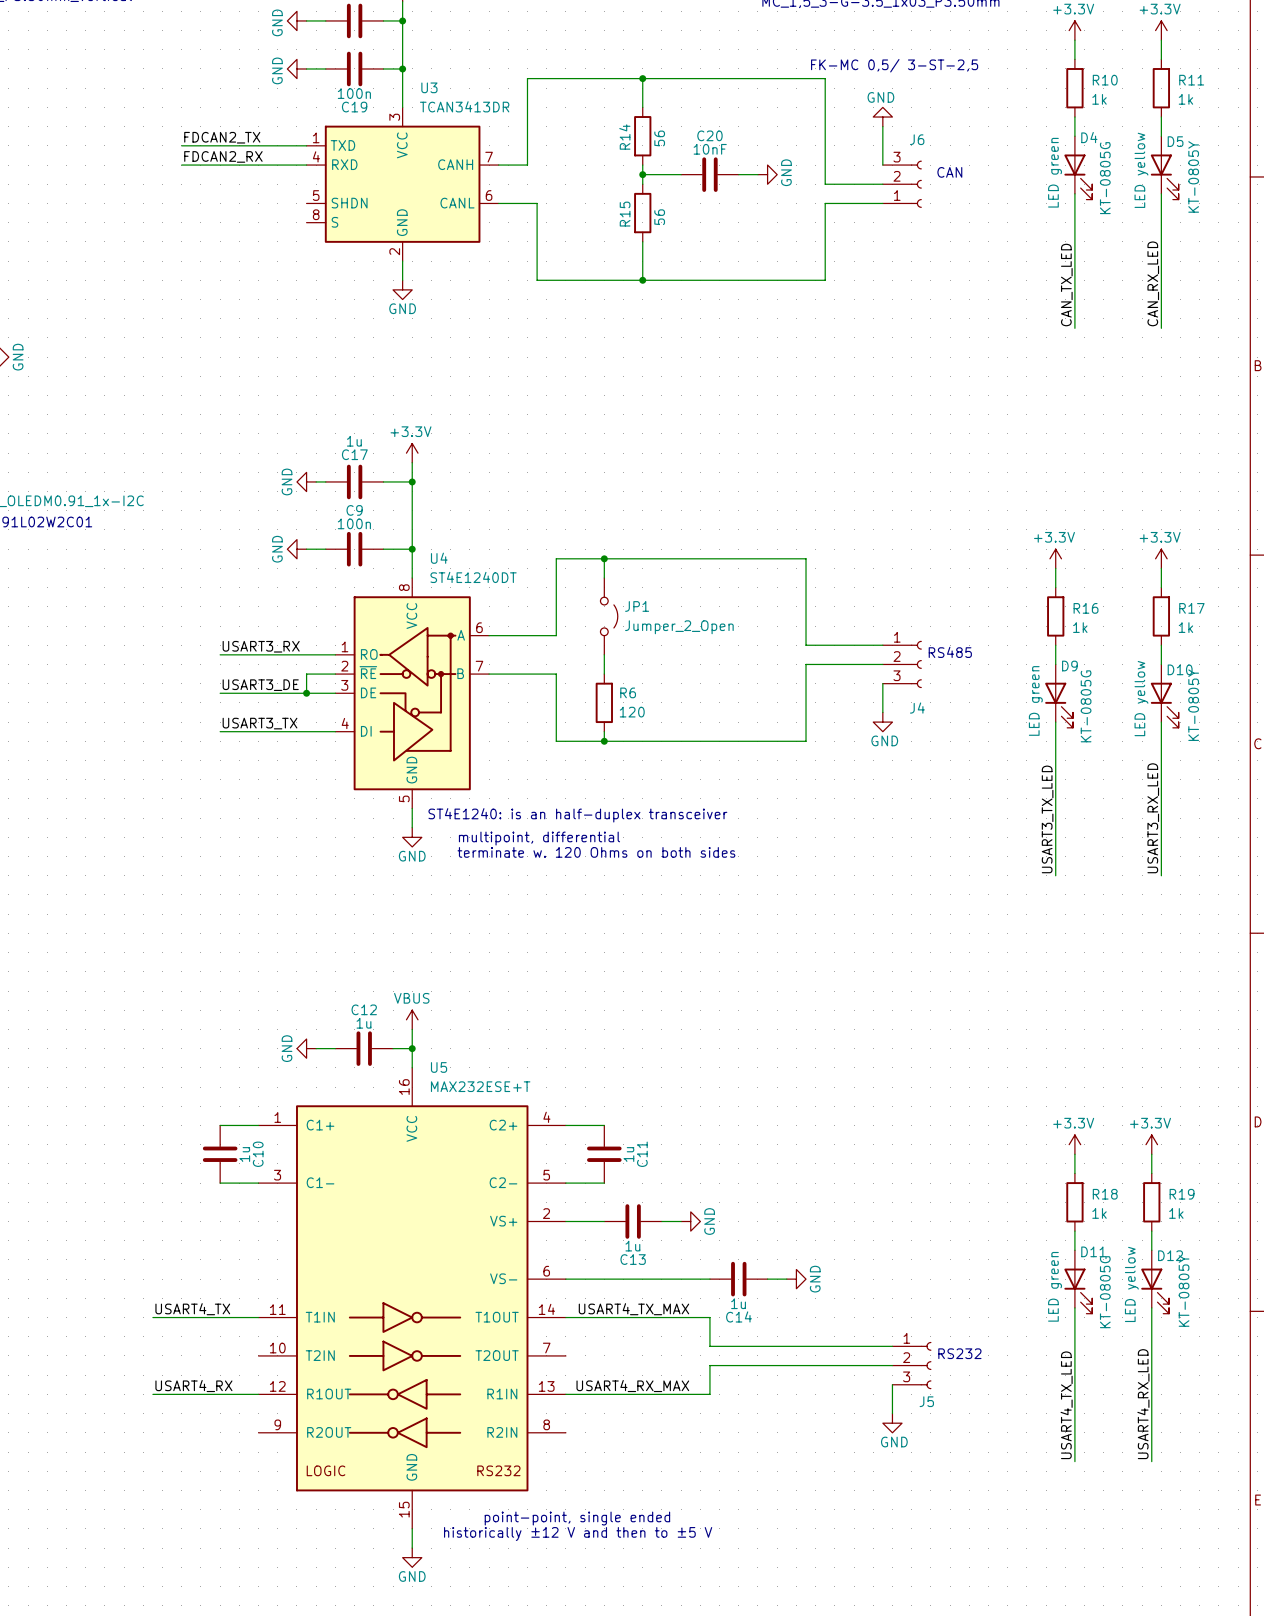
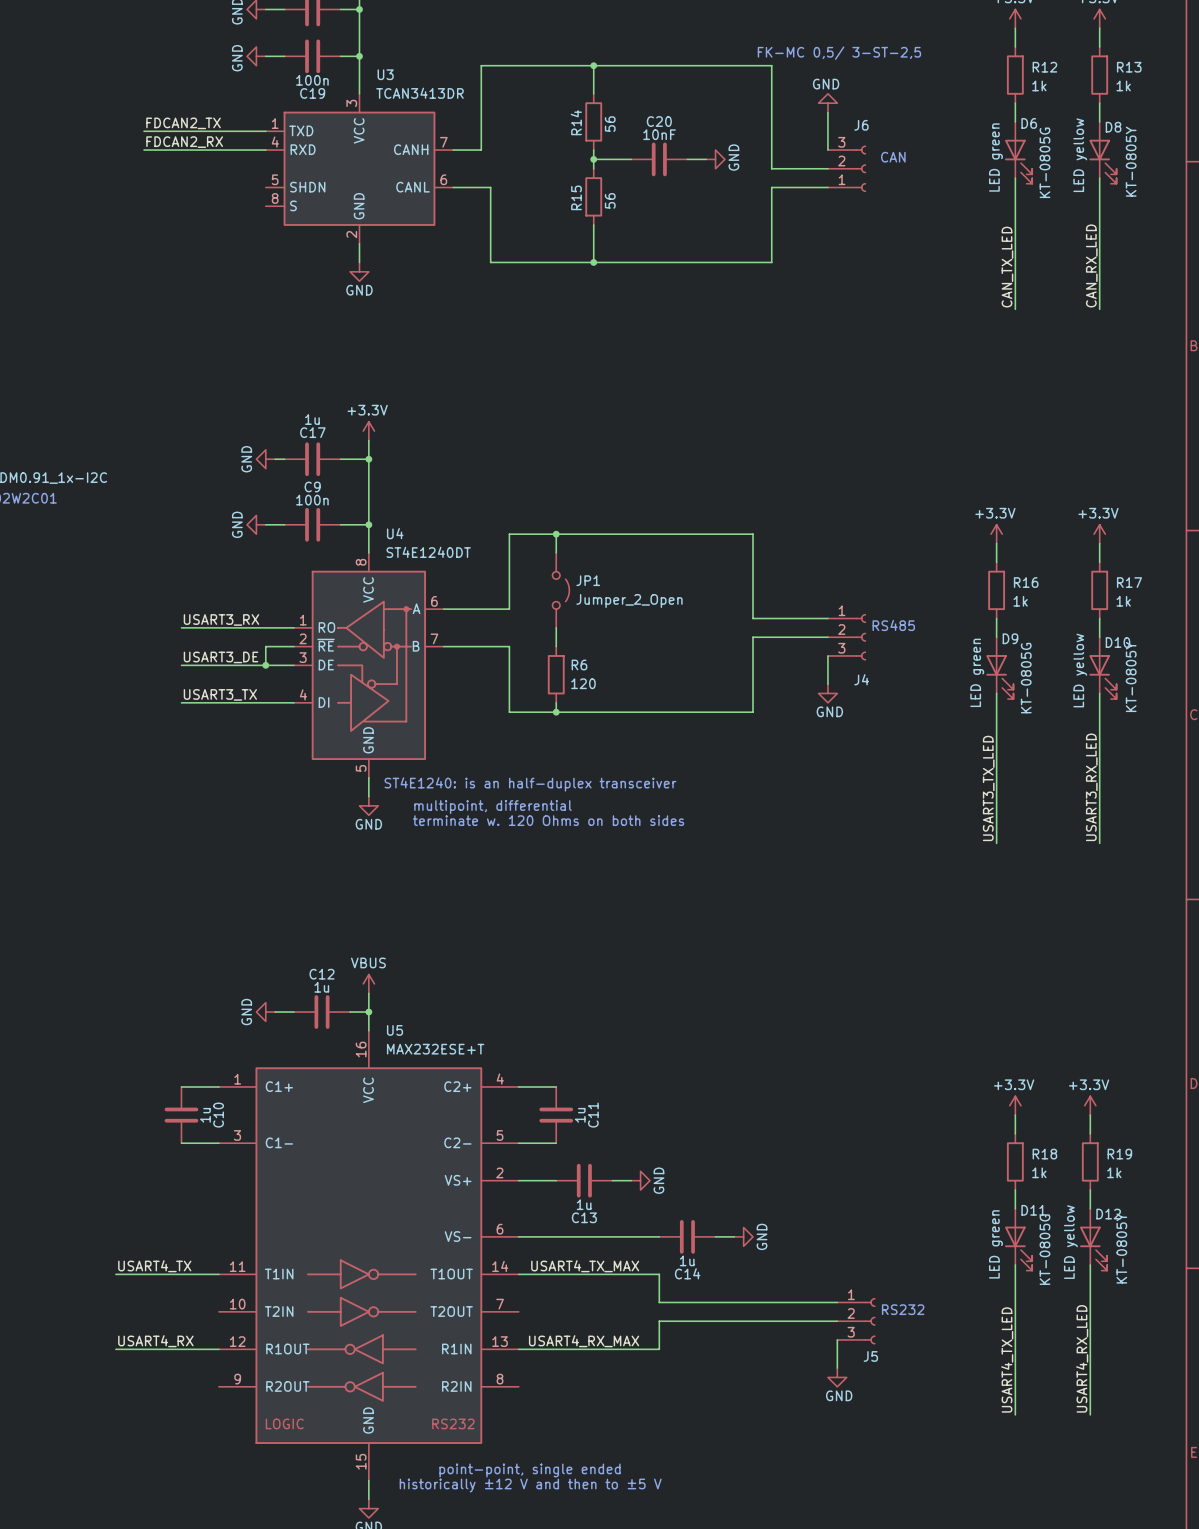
R10 name: R10 (1105, 80) -> R12 (1044, 67)
R11 name: R11 (1191, 80) -> R13 (1129, 67)
D4 name: D4 (1089, 137) -> D6 (1029, 123)
D5 name: D5 (1175, 141) -> D8 (1113, 127)

